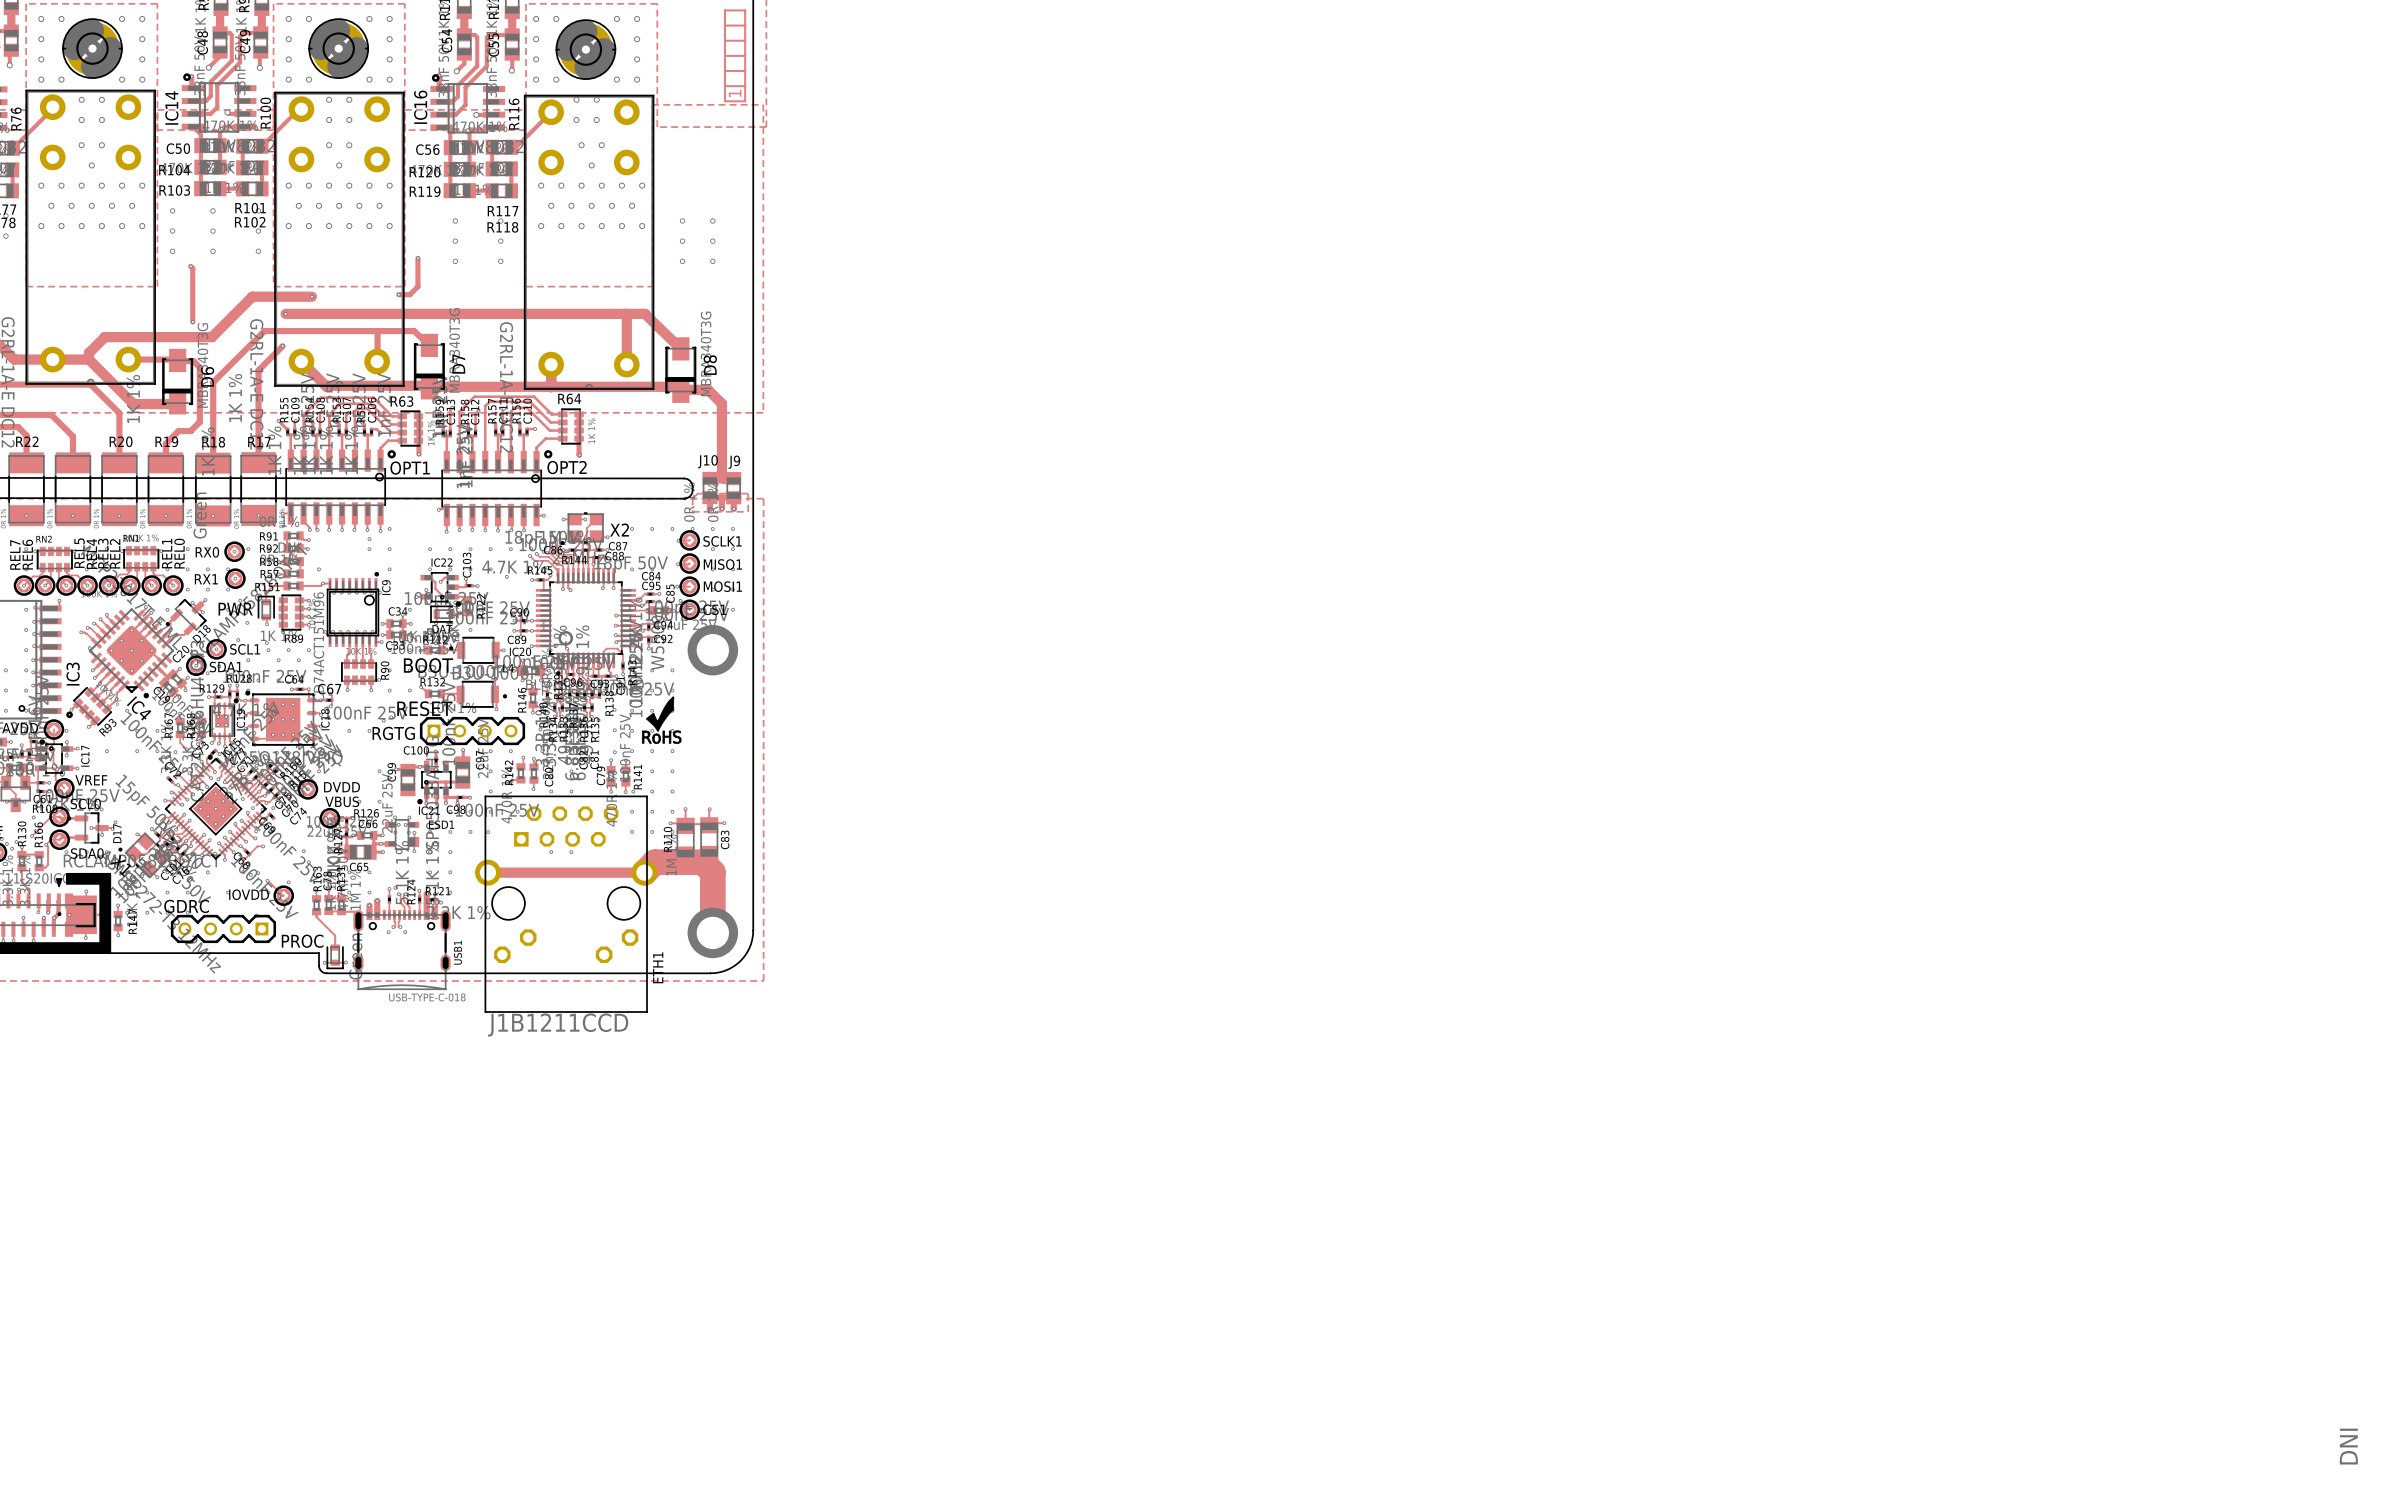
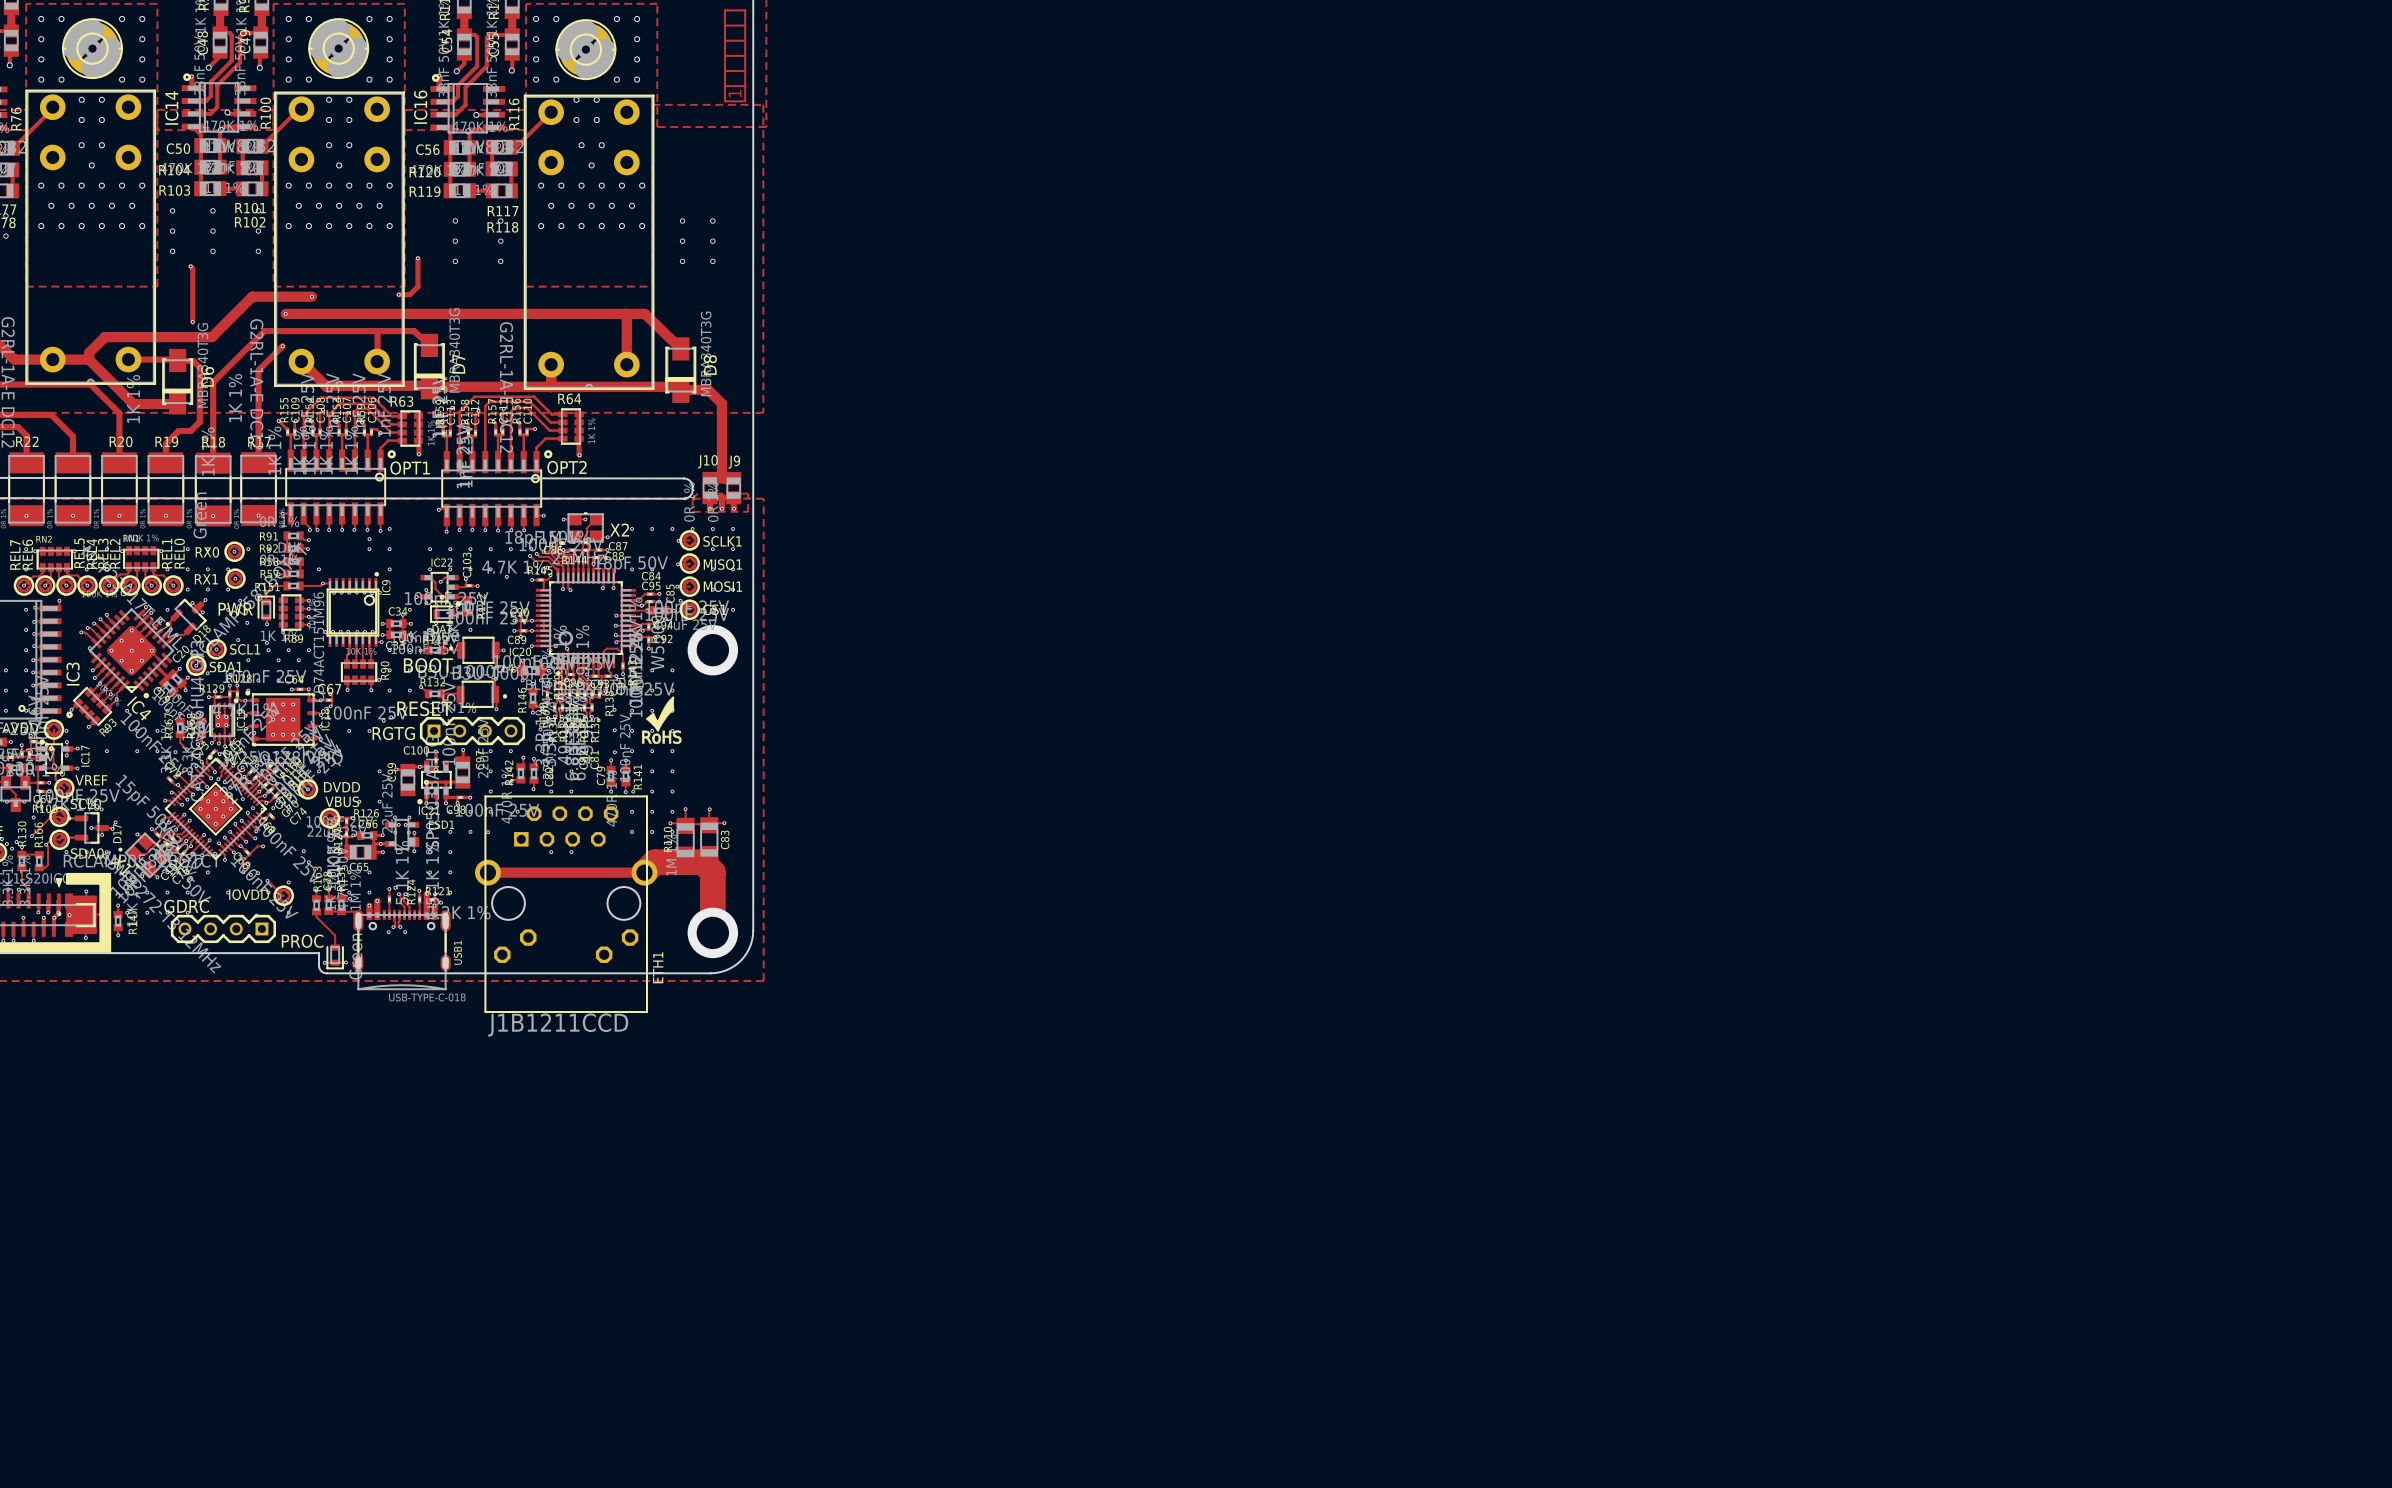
RGTG value: DNI (2348, 1446) -> none

